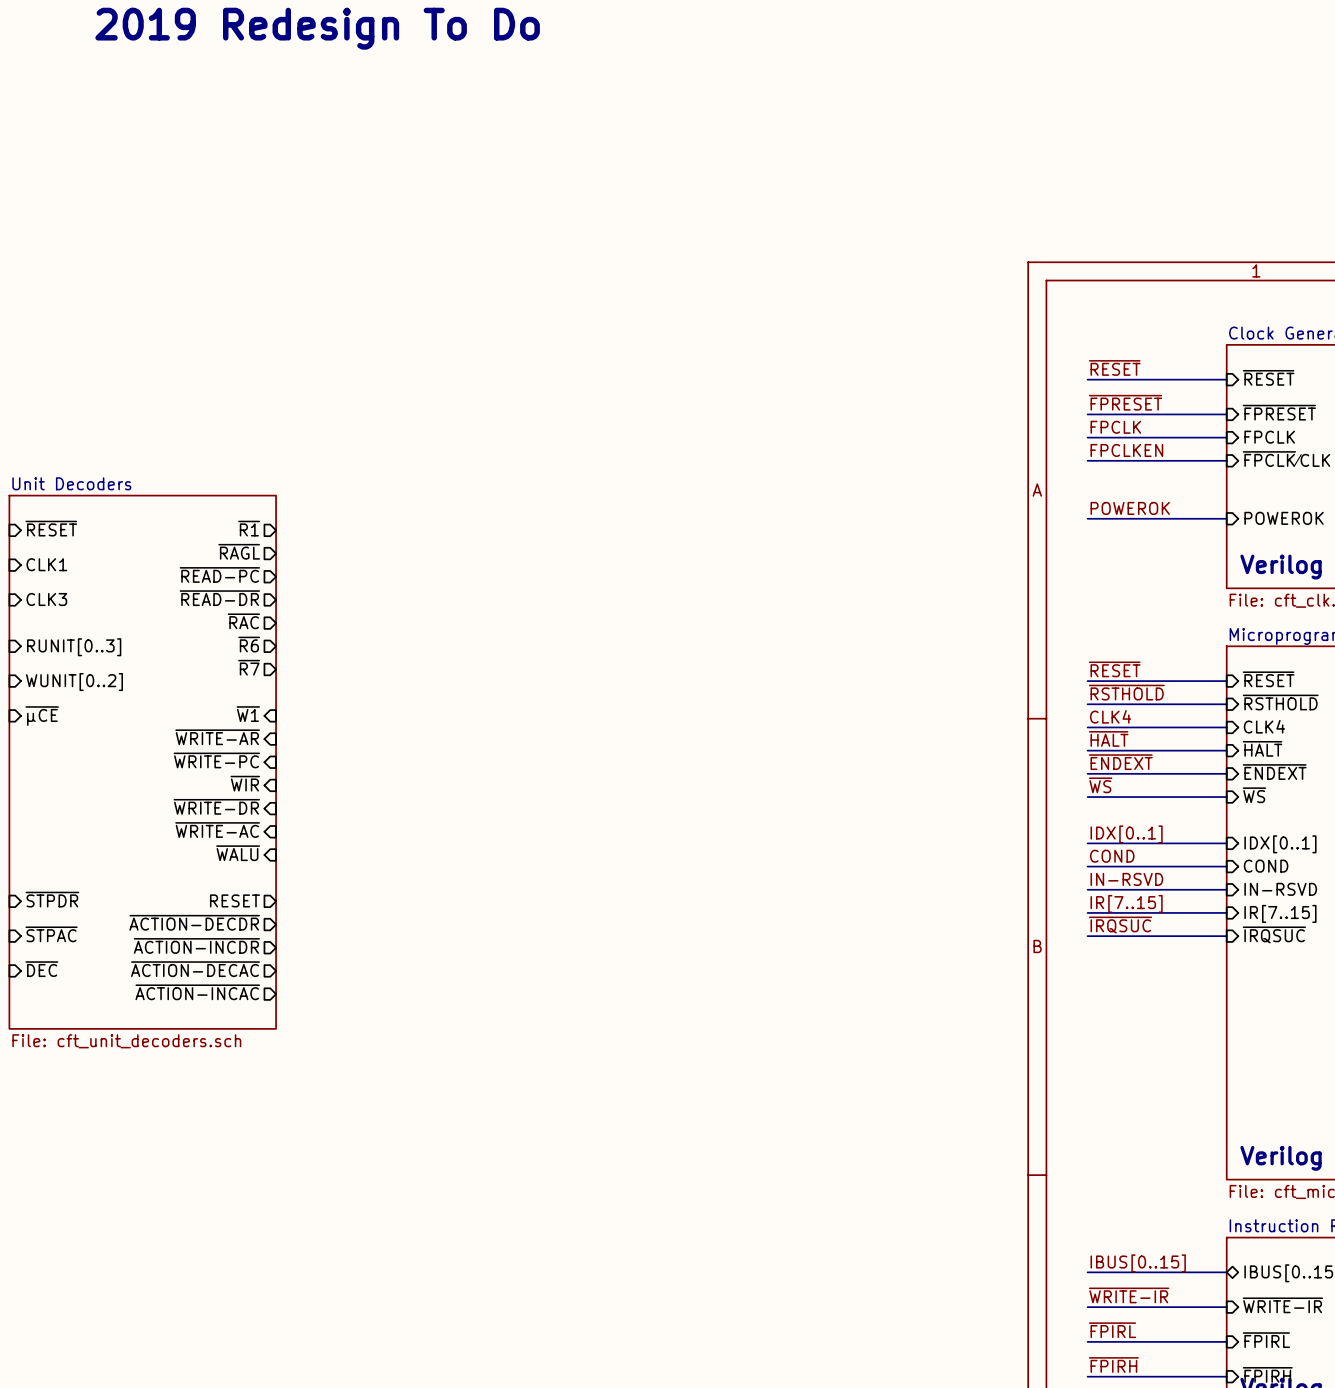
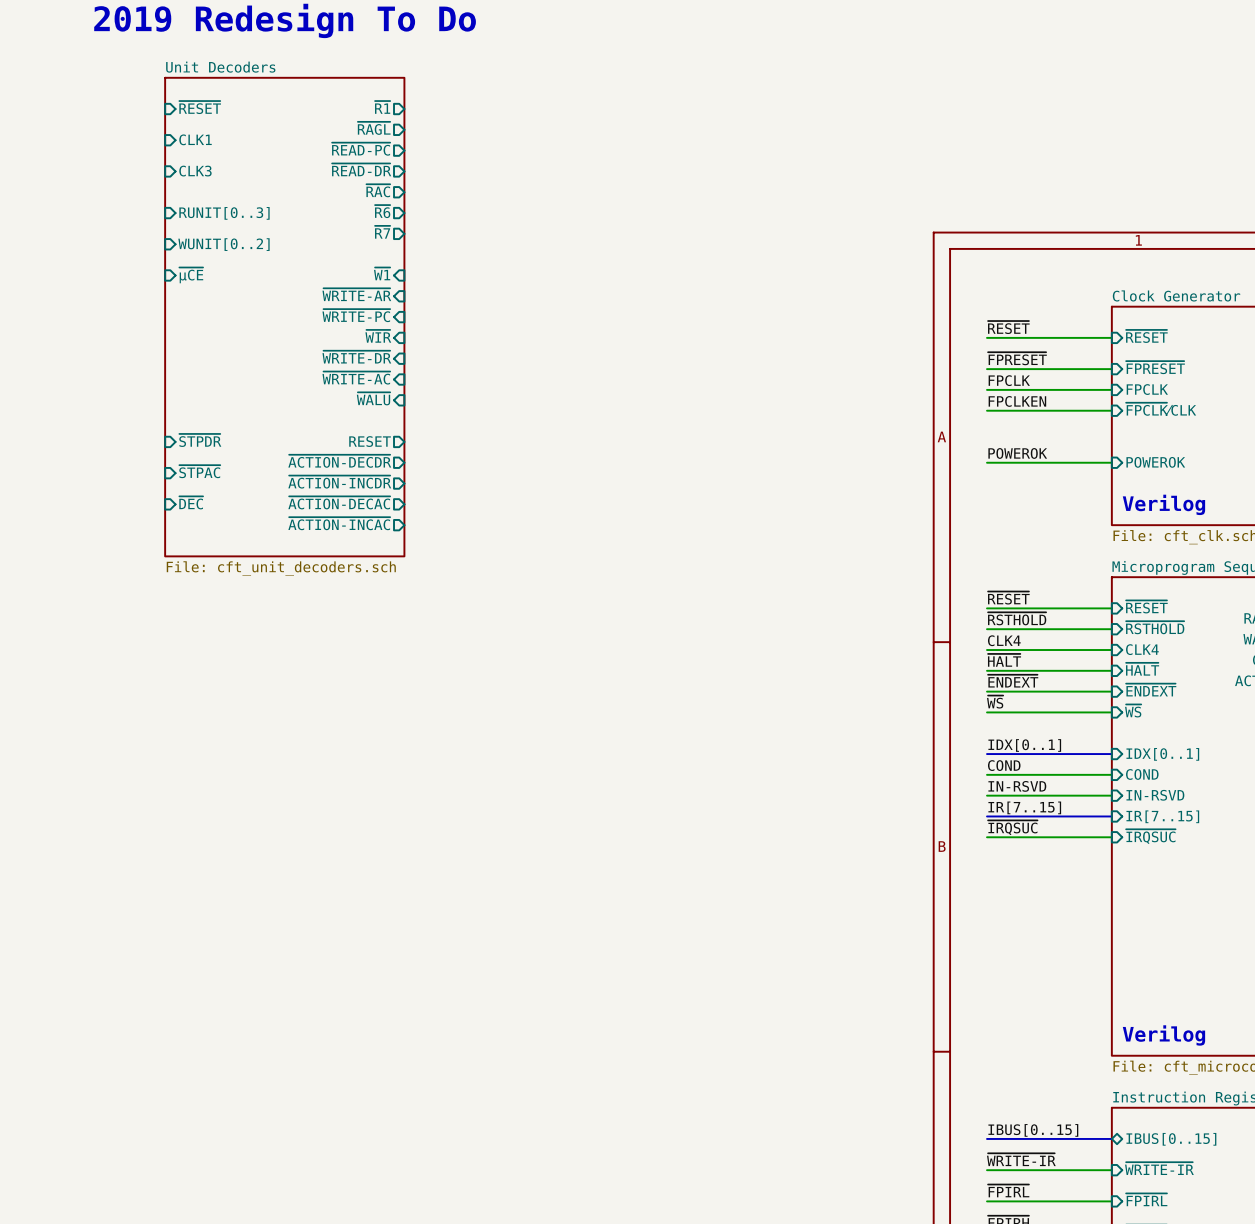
sheet pin: none -> ~{RESET} (200, 107)
sheet pin: none -> ~{R1} (382, 107)
sheet pin: none -> ~{RAGL} (374, 128)
sheet pin: none -> CLK1 (195, 139)
sheet pin: none -> ~{READ-PC} (361, 149)
sheet pin: none -> ~{READ-DR} (361, 169)
sheet pin: none -> CLK3 (195, 171)
sheet pin: none -> ~{RAC} (378, 190)
sheet pin: none -> ~{R6} (382, 211)
sheet pin: none -> RUNIT[0..3] (224, 213)
sheet pin: none -> ~{R7} (382, 232)
sheet pin: none -> WUNIT[0..2] (223, 244)
sheet pin: none -> ~{W1} (382, 273)
sheet pin: none -> ~{µCE} (191, 275)
sheet pin: none -> ~{WRITE-AR} (356, 294)
sheet pin: none -> ~{WRITE-PC} (356, 315)
sheet Unit Decoders: none -> File: cft_unit_decoders.sch (284, 317)
sheet pin: none -> ~{WIR} (378, 336)
sheet pin: none -> ~{WRITE-DR} (356, 357)
sheet pin: none -> ~{WRITE-AC} (356, 378)
sheet pin: none -> ~{WALU} (373, 398)
sheet pin: none -> ~{STPDR} (200, 440)
sheet pin: none -> RESET (370, 441)
sheet pin: none -> ~{ACTION-DECDR} (339, 461)
sheet pin: ~{RESET} (51, 528) -> none
sheet pin: none -> ~{STPAC} (199, 471)
sheet pin: ~{R1} (249, 528) -> none
sheet pin: none -> ~{ACTION-INCDR} (339, 482)
sheet pin: ~{RAGL} (239, 551) -> none
sheet pin: none -> ~{ACTION-DECAC} (339, 502)
sheet pin: CLK1 (46, 564) -> none
sheet pin shape: output (219, 574) -> input (191, 502)
sheet pin: ~{READ-PC} (219, 574) -> ~{DEC} (191, 502)
sheet pin: none -> ~{ACTION-INCAC} (339, 523)
sheet pin: ~{READ-DR} (219, 598) -> none
sheet pin: CLK3 (46, 599) -> none
sheet pin: ~{RAC} (243, 621) -> none
sheet pin: ~{R6} (249, 644) -> none
sheet pin: RUNIT[0..3] (74, 647) -> none
sheet pin: ~{R7} (249, 667) -> none
sheet pin: WUNIT[0..2] (74, 682) -> none
sheet pin: ~{W1} (248, 714) -> none
sheet pin: ~{µCE} (42, 716) -> none
sheet pin: ~{WRITE-AR} (217, 737) -> none
sheet pin: ~{WRITE-PC} (216, 760) -> none
sheet Unit Decoders: File: cft_unit_decoders.sch (142, 762) -> none
sheet pin: ~{WIR} (245, 783) -> none
sheet pin: ~{WRITE-DR} (216, 806) -> none
sheet pin: ~{WRITE-AC} (217, 830) -> none
sheet pin: ~{WALU} (238, 853) -> none
sheet pin: ~{STPDR} (52, 899) -> none
sheet pin: RESET (235, 900) -> none
sheet pin: ~{ACTION-DECDR} (194, 922) -> none
sheet pin: ~{STPAC} (51, 934) -> none
sheet pin: ~{ACTION-INCDR} (196, 945) -> none
sheet pin: ~{DEC} (41, 969) -> none
sheet pin: ~{ACTION-DECAC} (195, 969) -> none
sheet pin: ~{ACTION-INCAC} (197, 992) -> none

